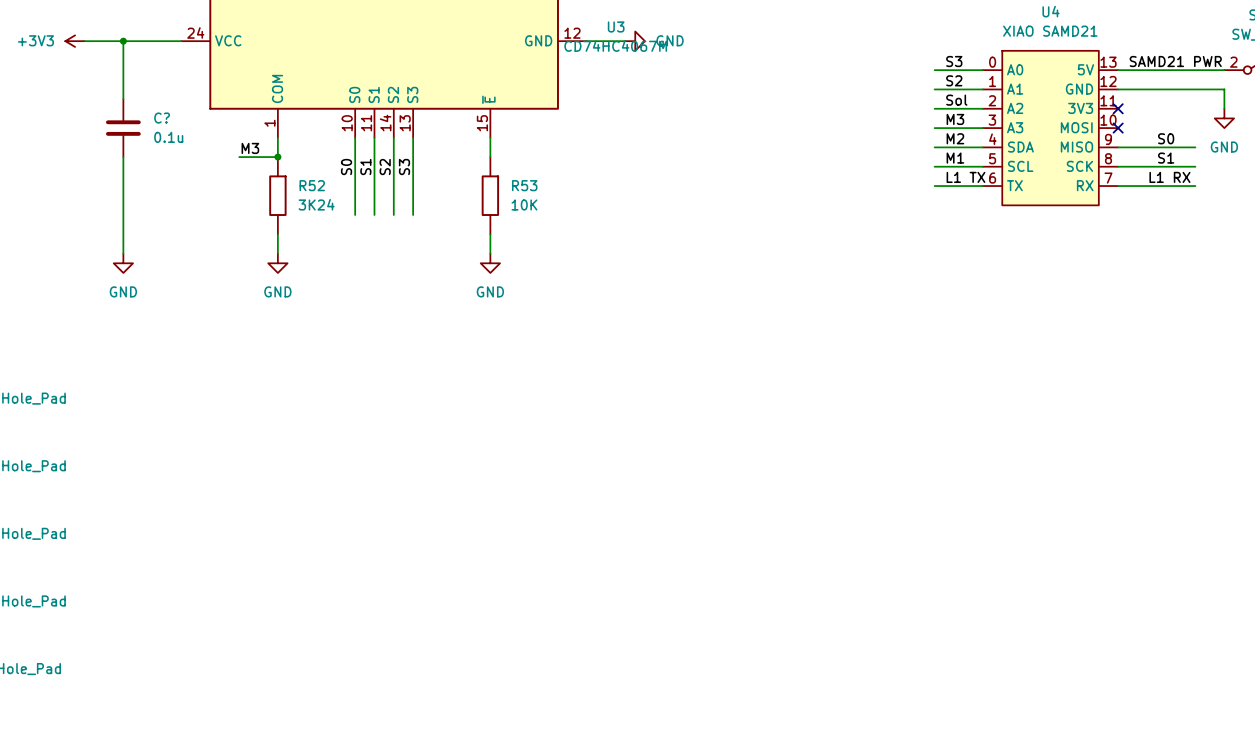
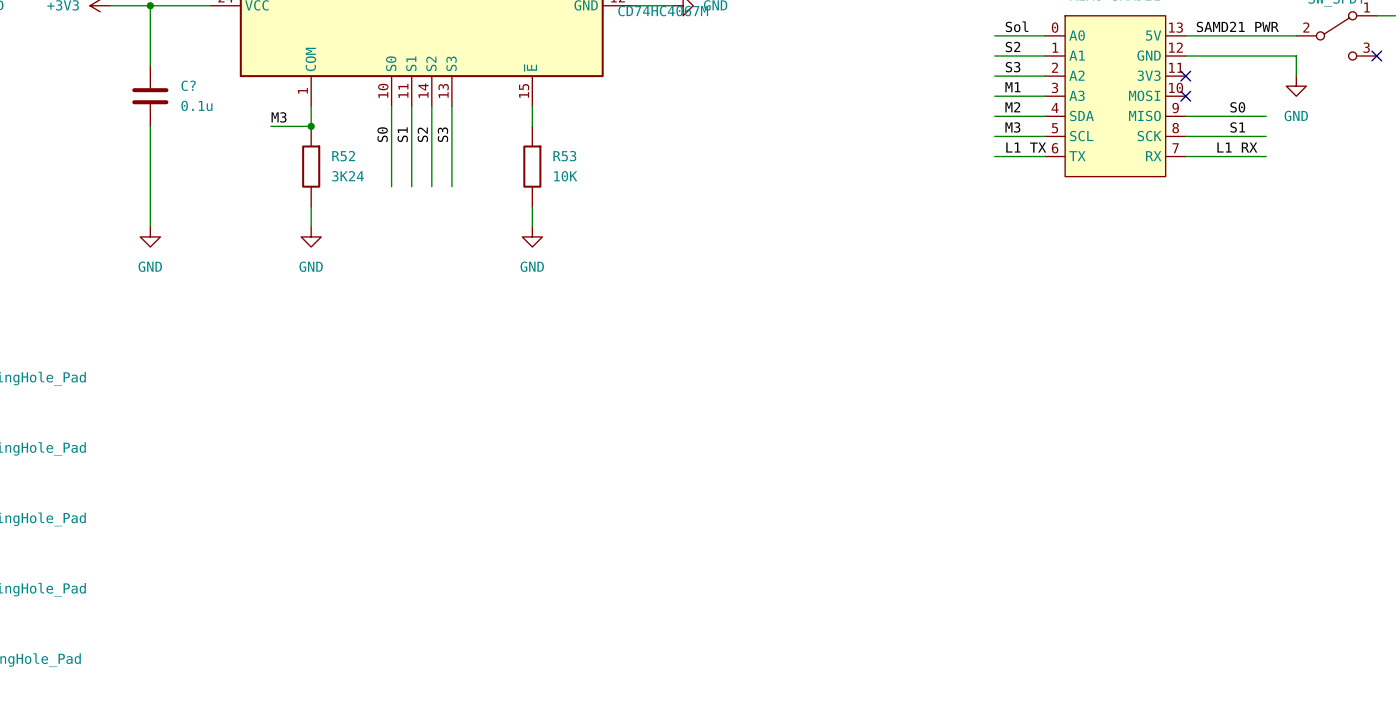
label: S3 (954, 61) -> Sol (1017, 26)
label: Sol (956, 100) -> S3 (1013, 67)
label: M3 (955, 119) -> M1 (1012, 87)
label: M1 (955, 158) -> M3 (1012, 127)

